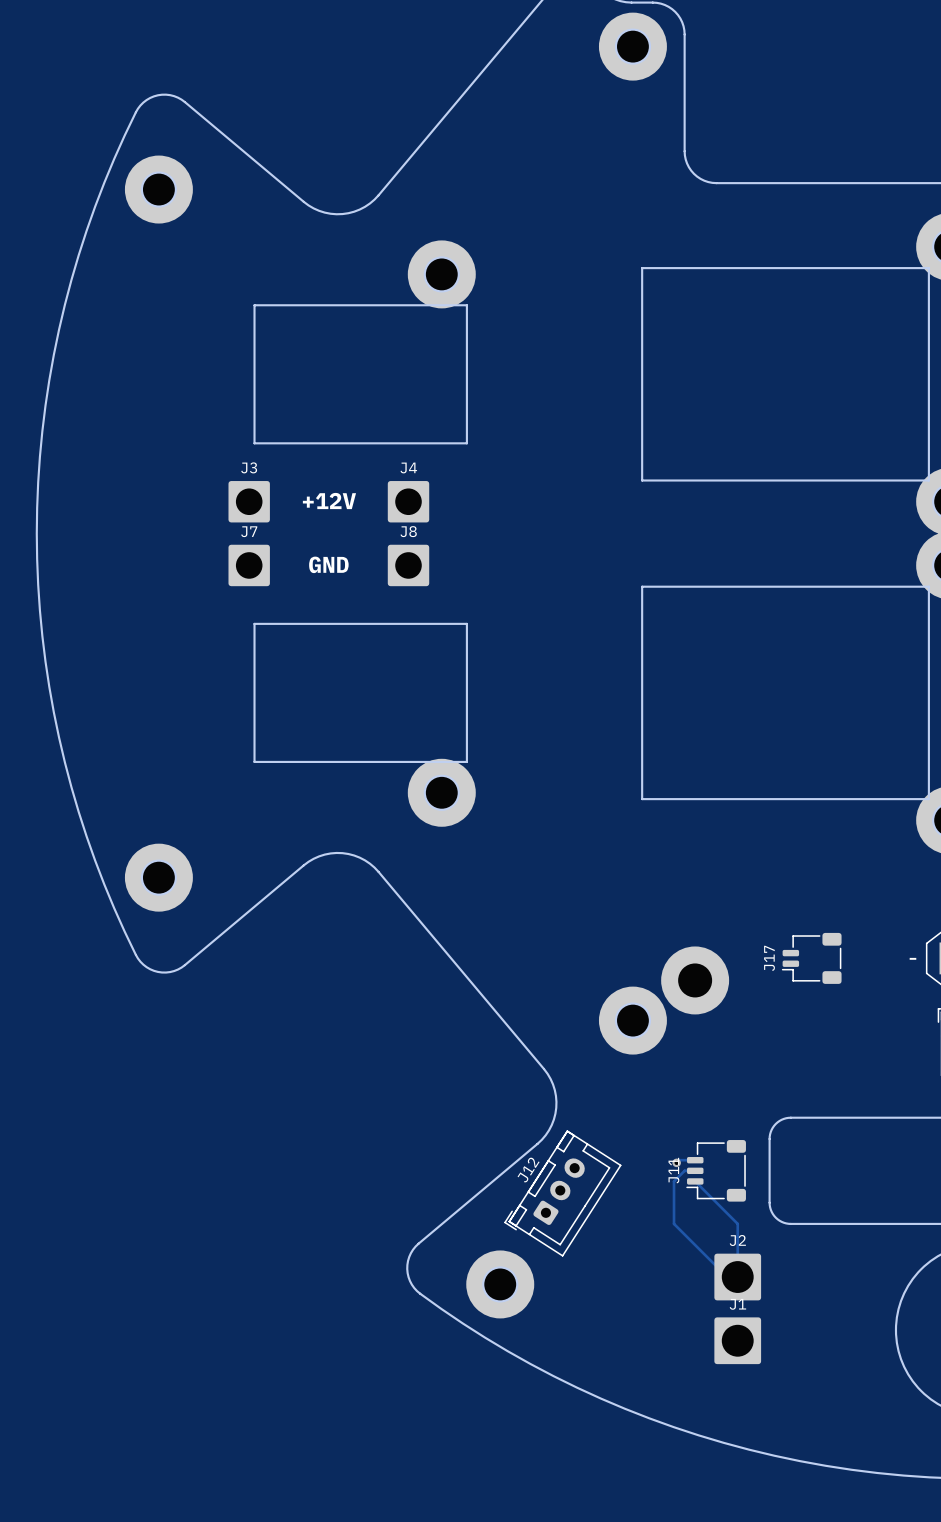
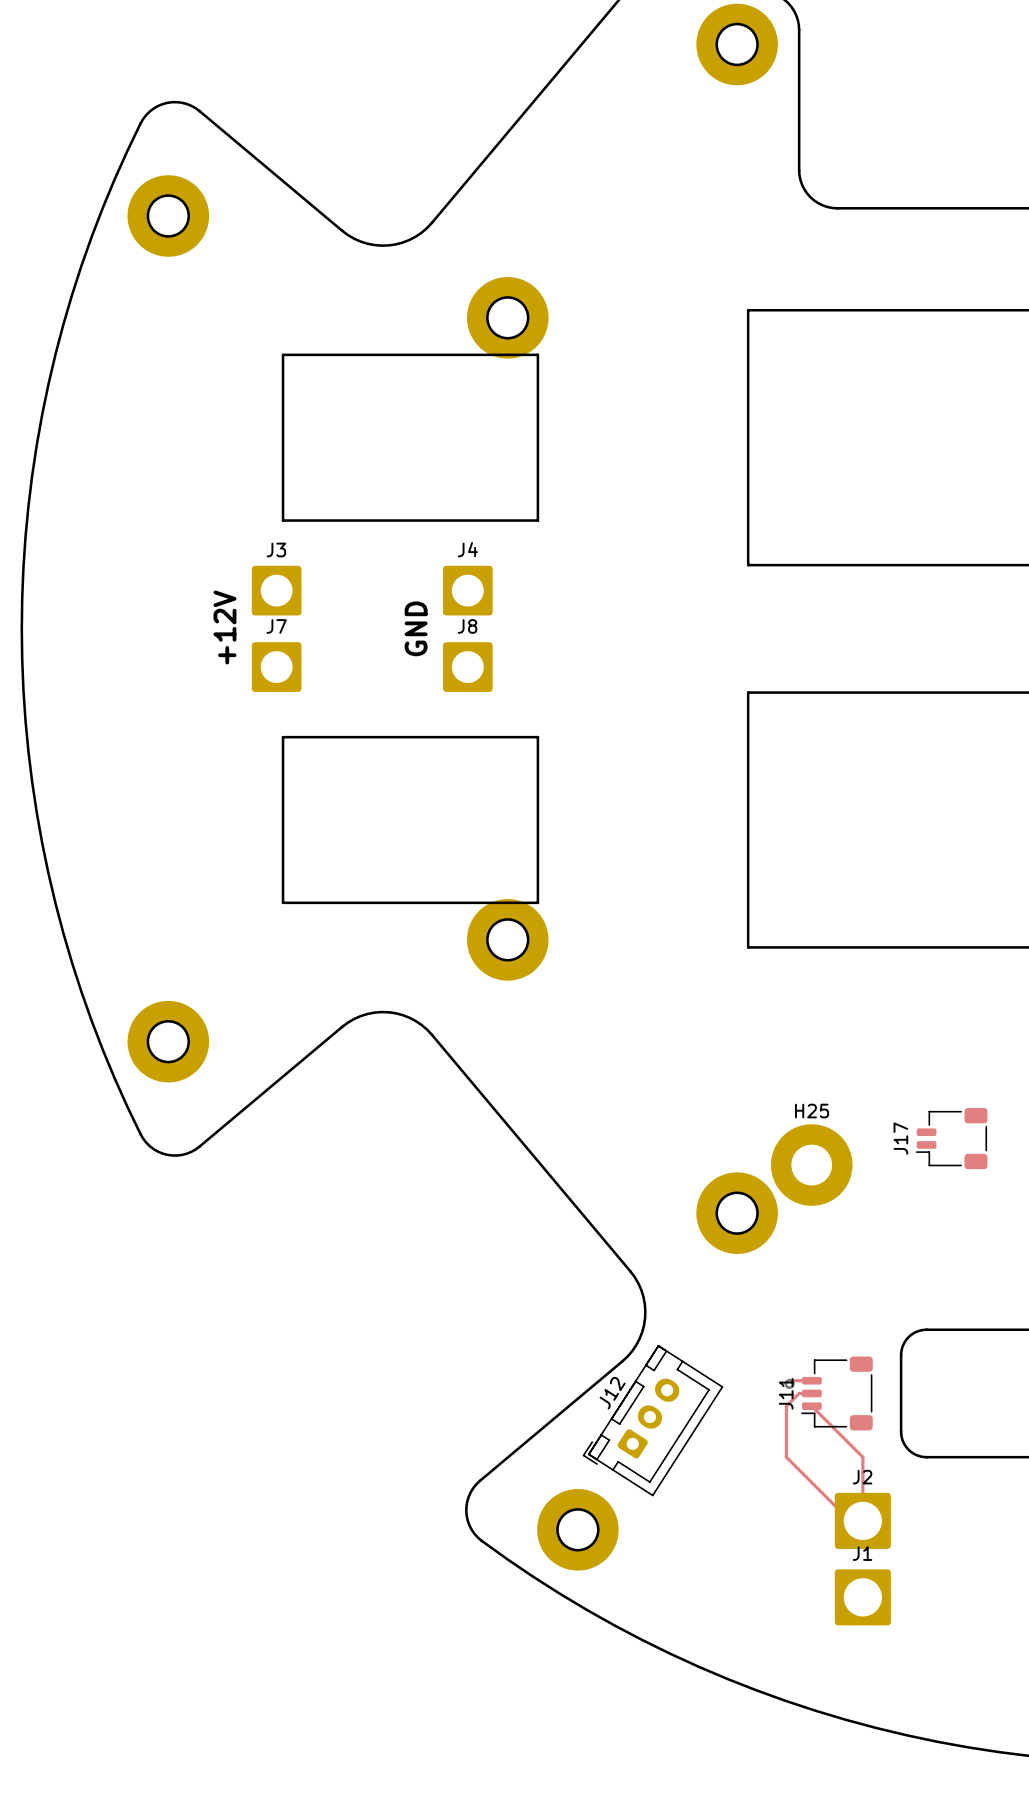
text rotation: 0° (329, 501) -> 90° counterclockwise (224, 627)
text position: +12V (329, 501) -> +12V (224, 627)
text rotation: 0° (328, 564) -> 90° counterclockwise (416, 628)
H25 name: none -> H25 (812, 1111)

